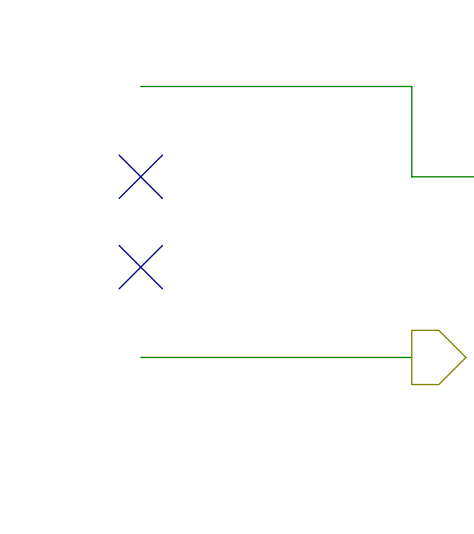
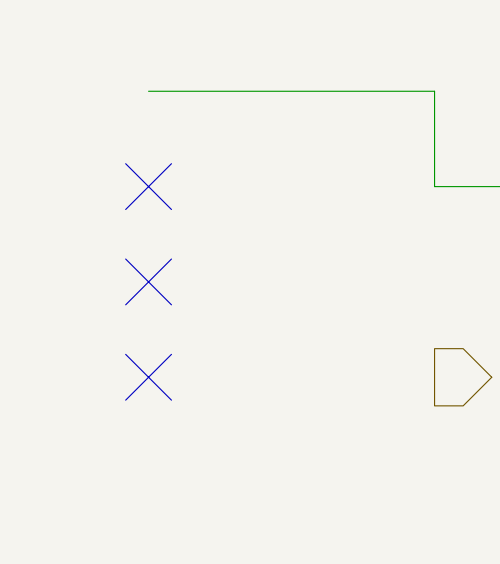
wire: (140, 357) (411, 357) -> none
no-connect mark: none -> (148, 377)

